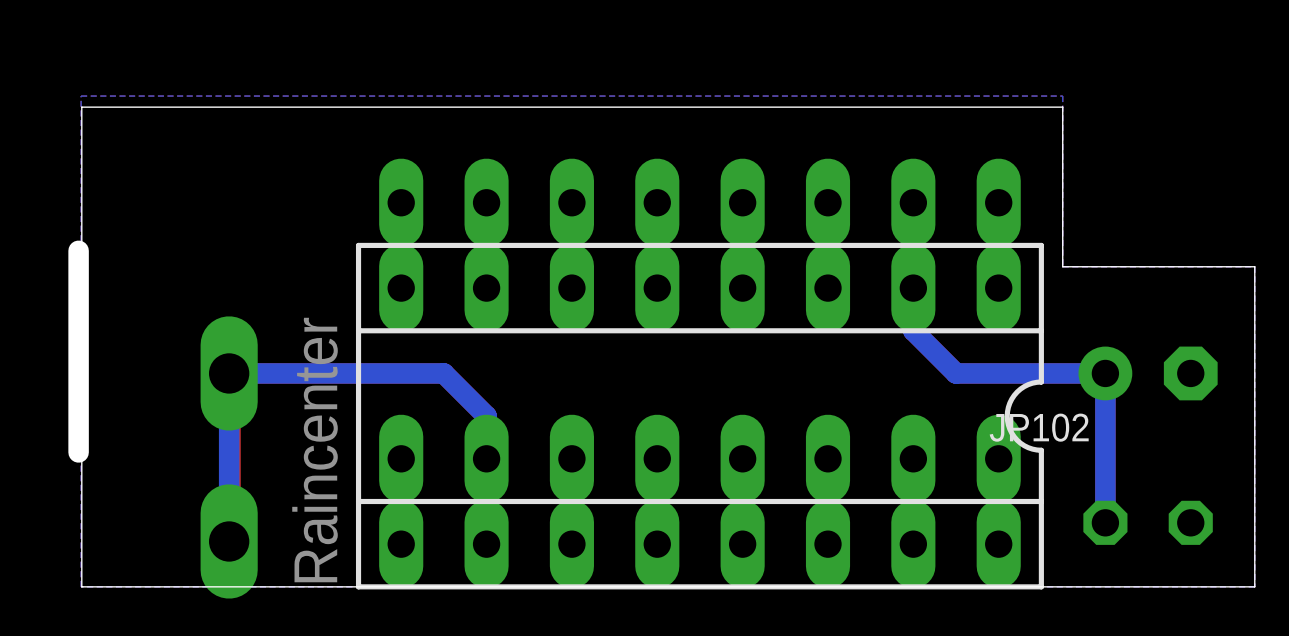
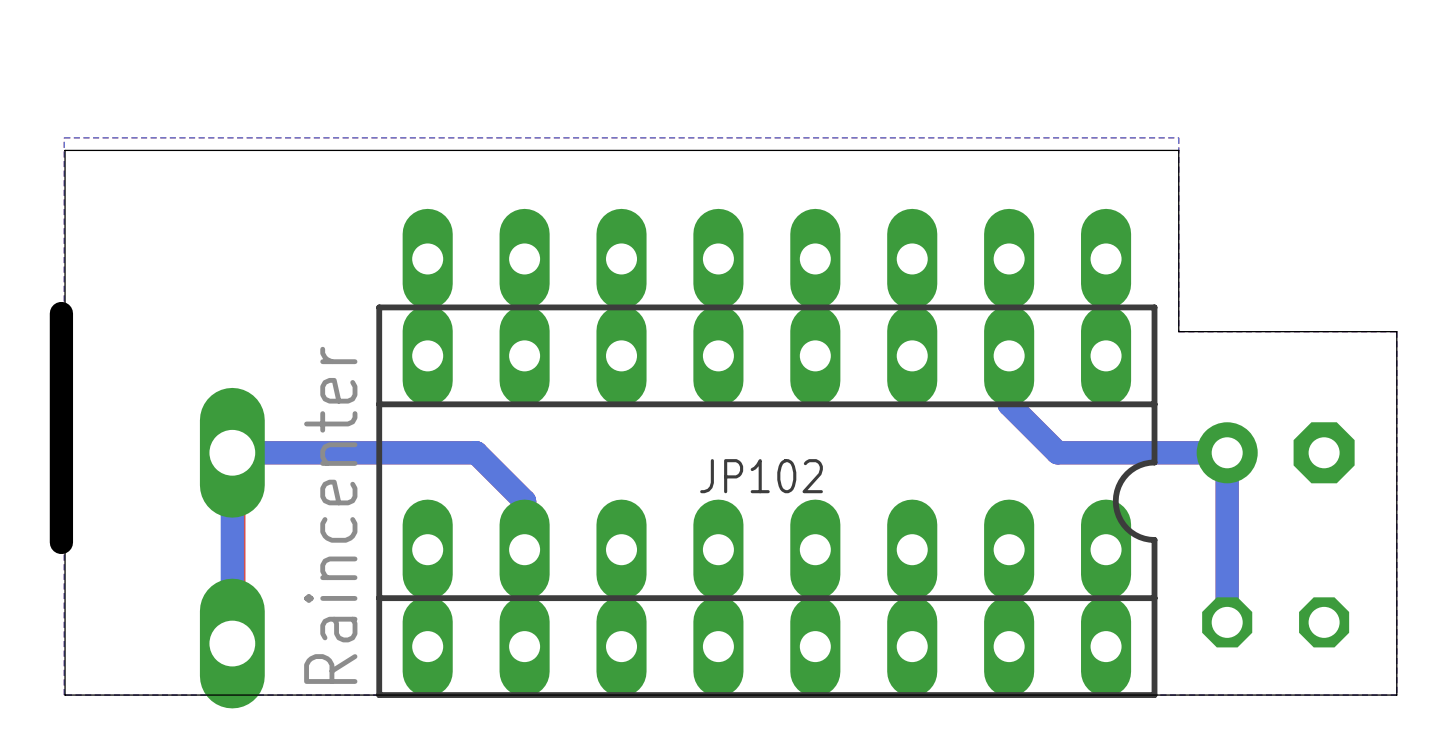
JP102 name position: JP102 (1039, 427) -> JP102 (761, 476)

